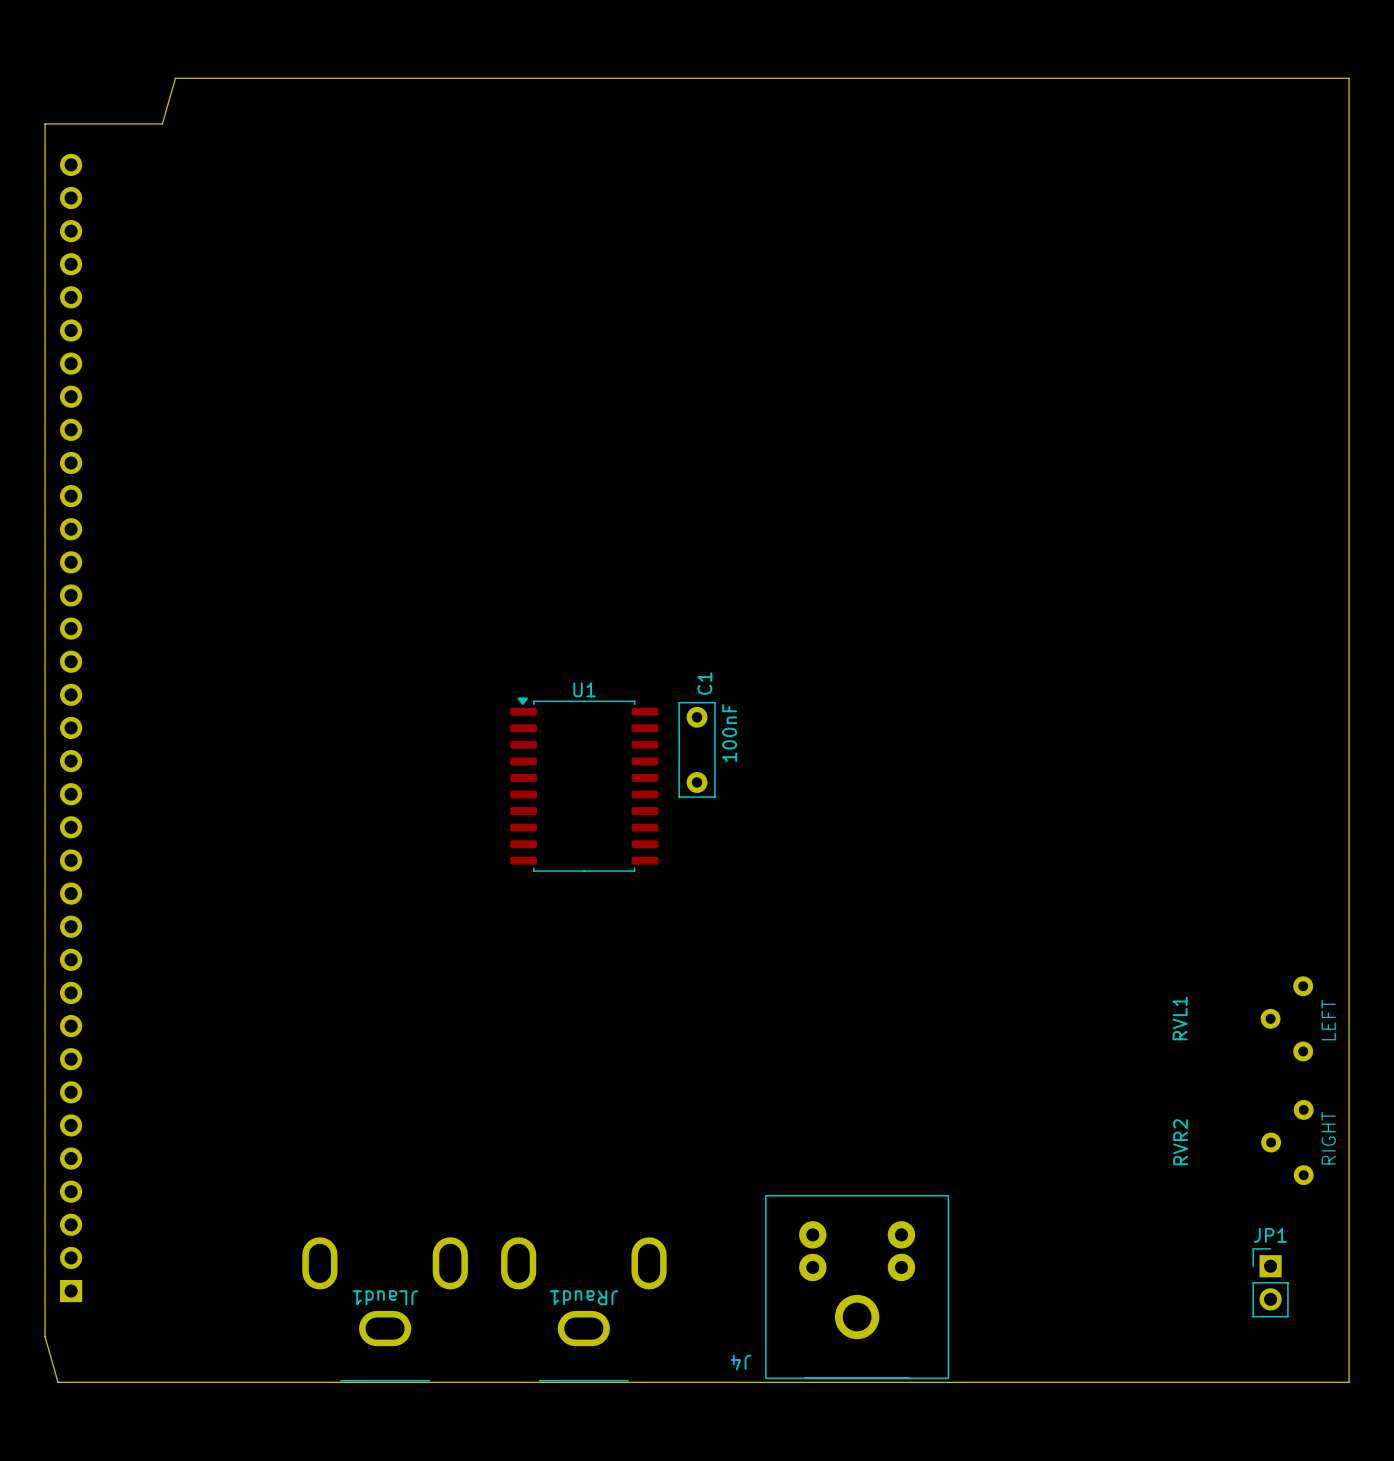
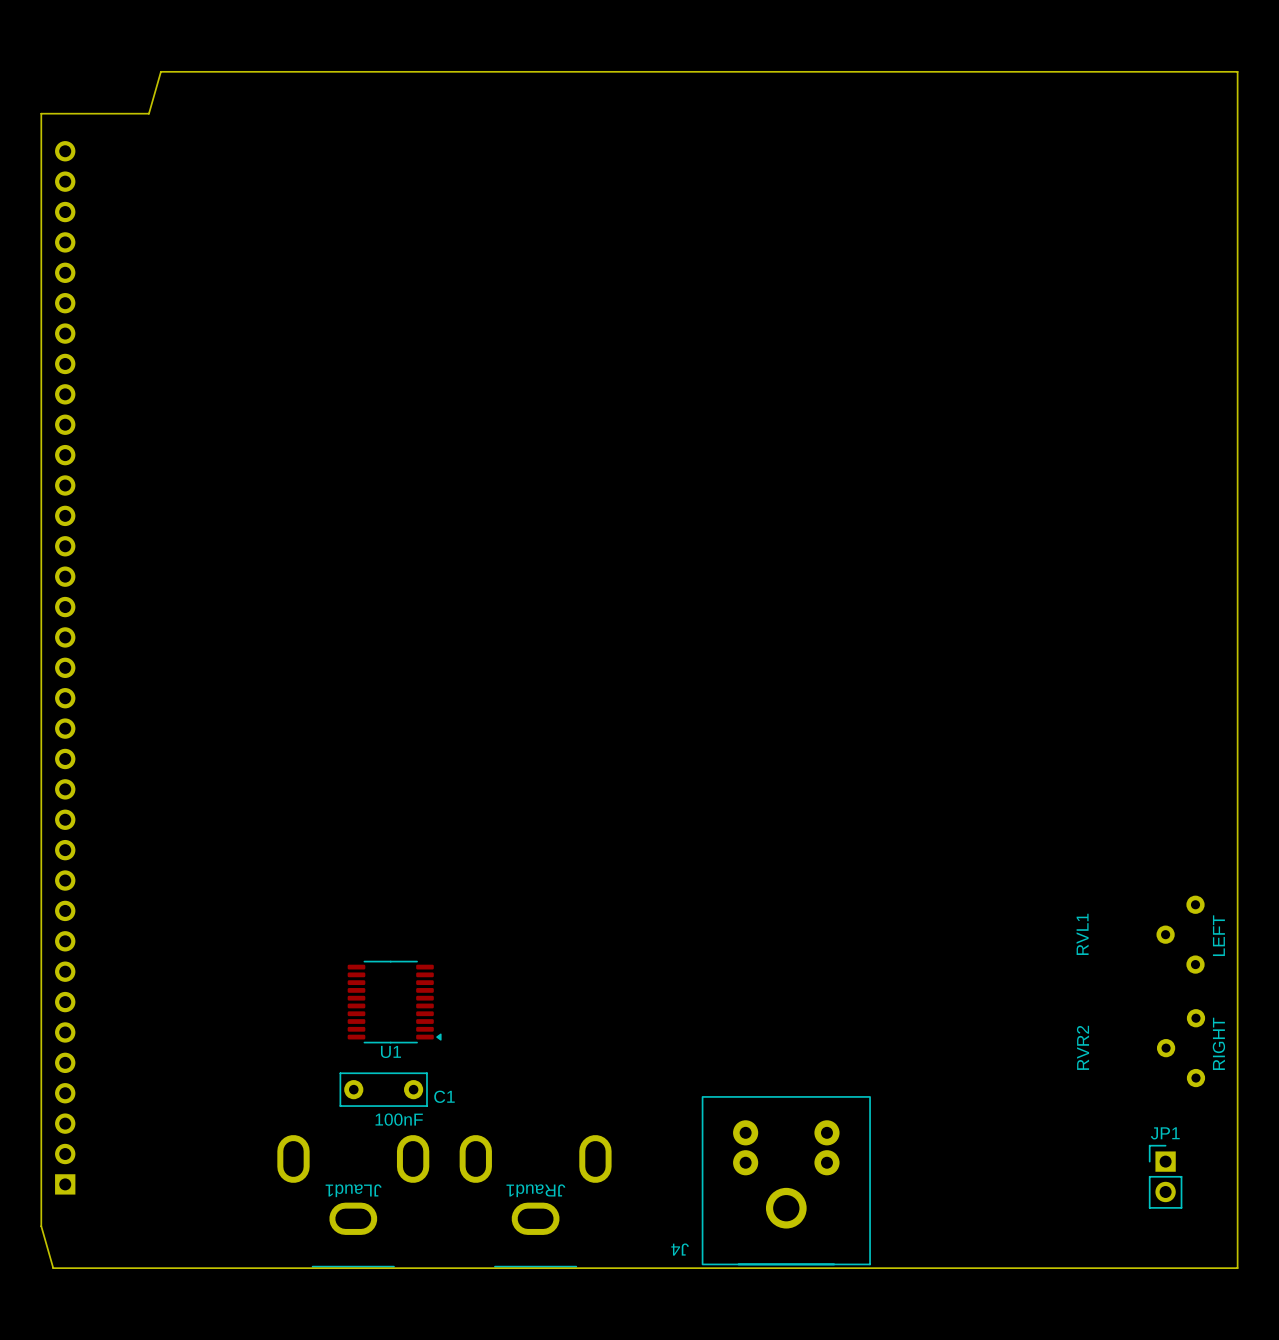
U1 name position: U1 (584, 689) -> U1 (390, 1051)
U1 footprint: [510, 697, 659, 872] -> [347, 960, 442, 1044]
C1 rotation: 0° (697, 749) -> 90° clockwise (383, 1089)
C1 position: (697, 749) -> (383, 1089)

